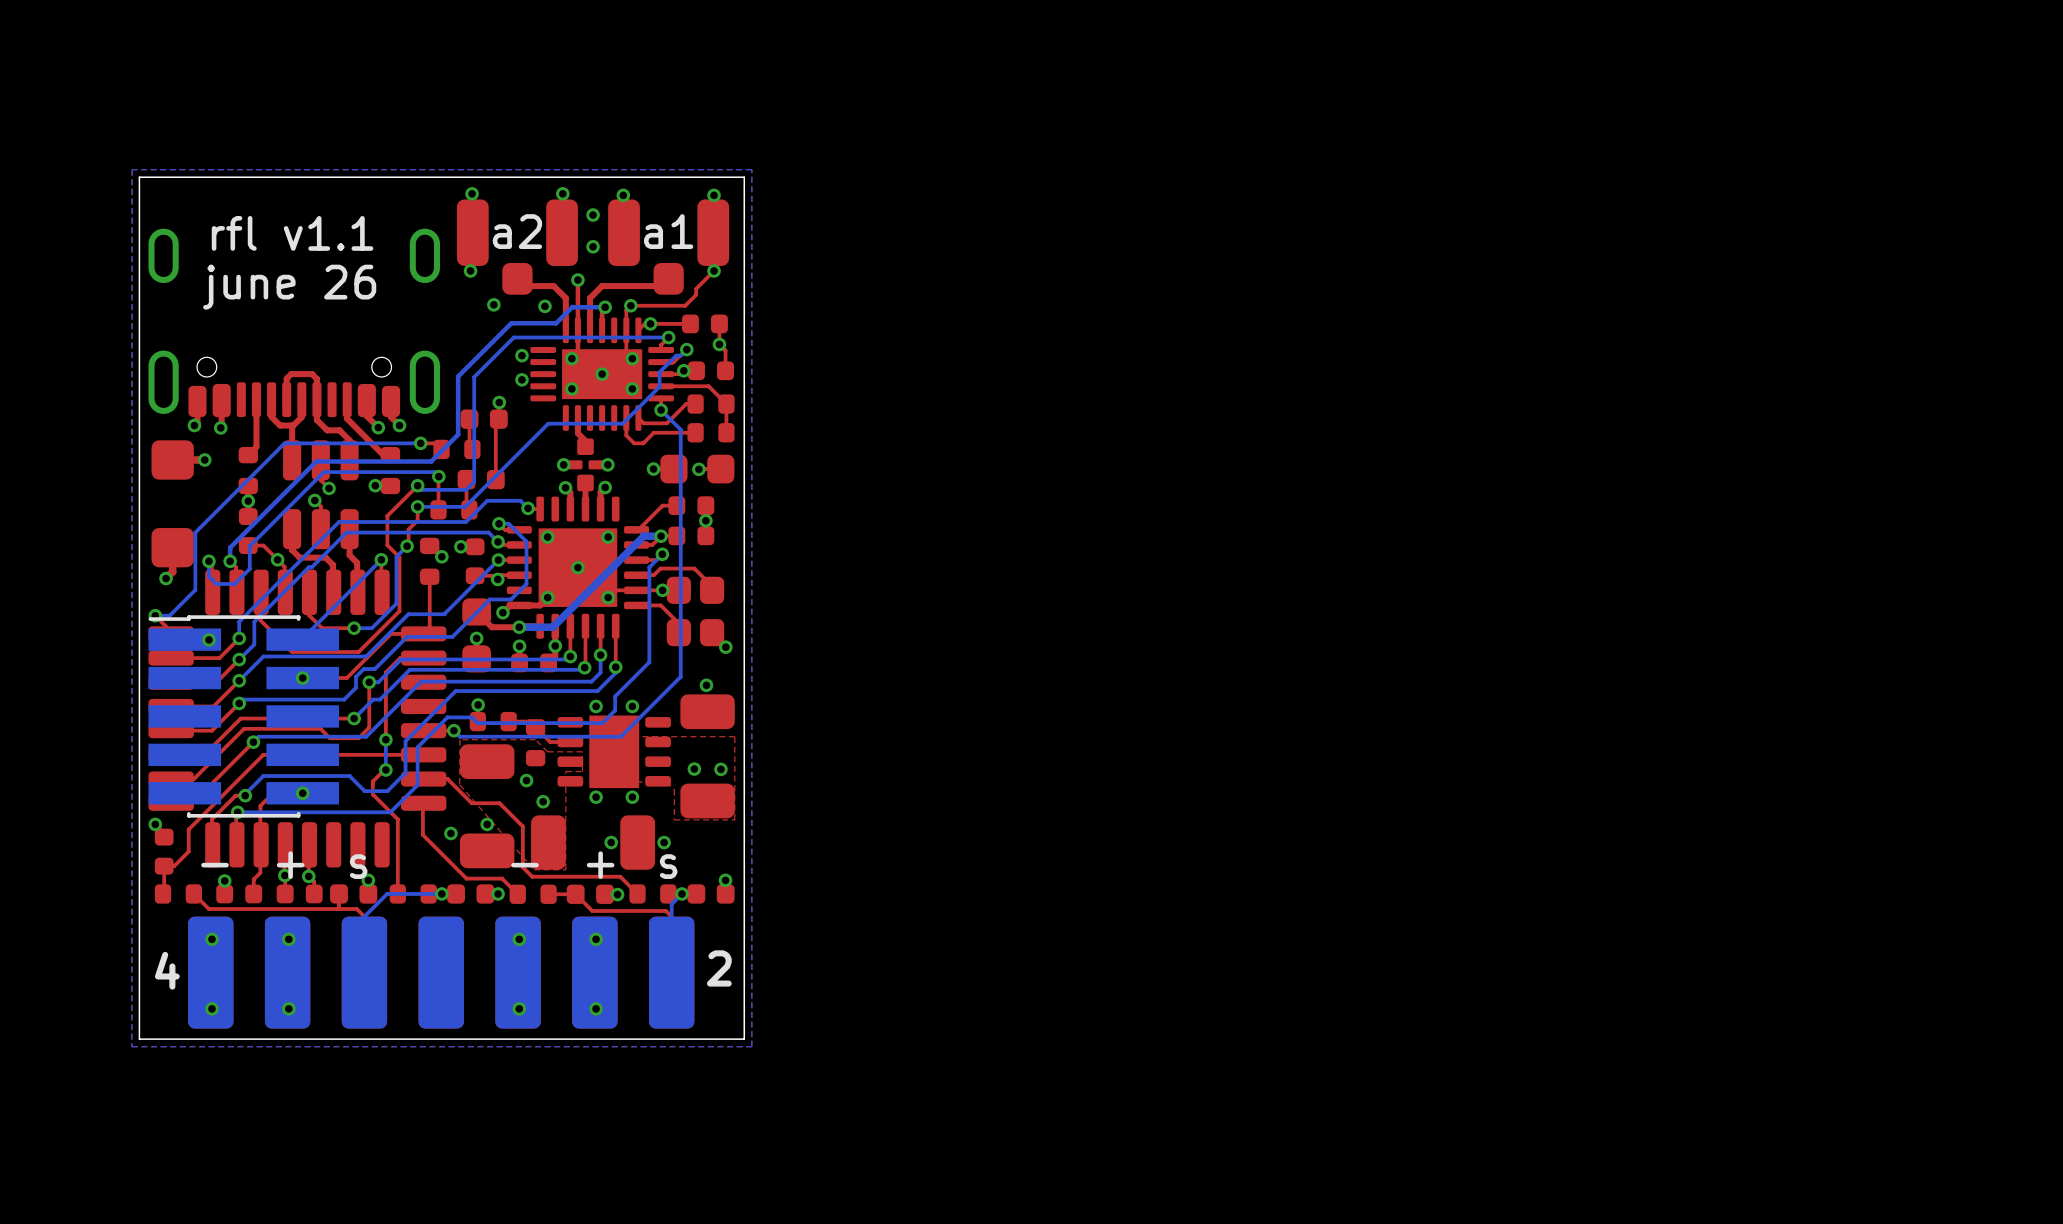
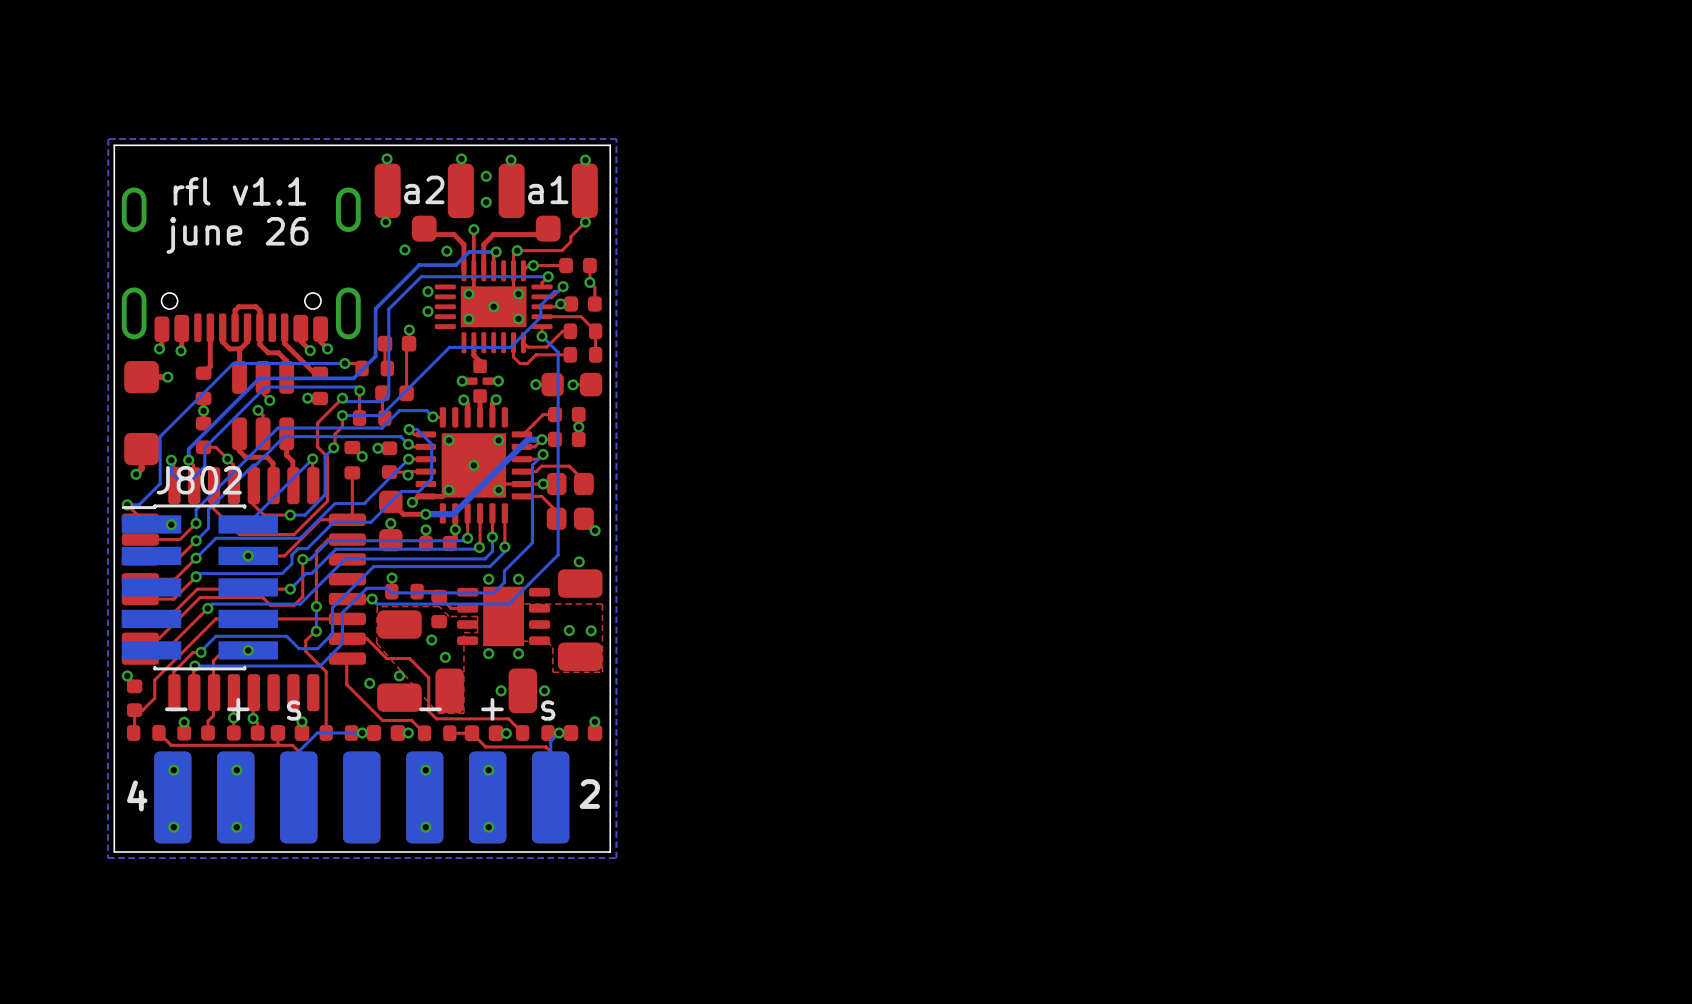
J802 name: none -> J802 (199, 480)

